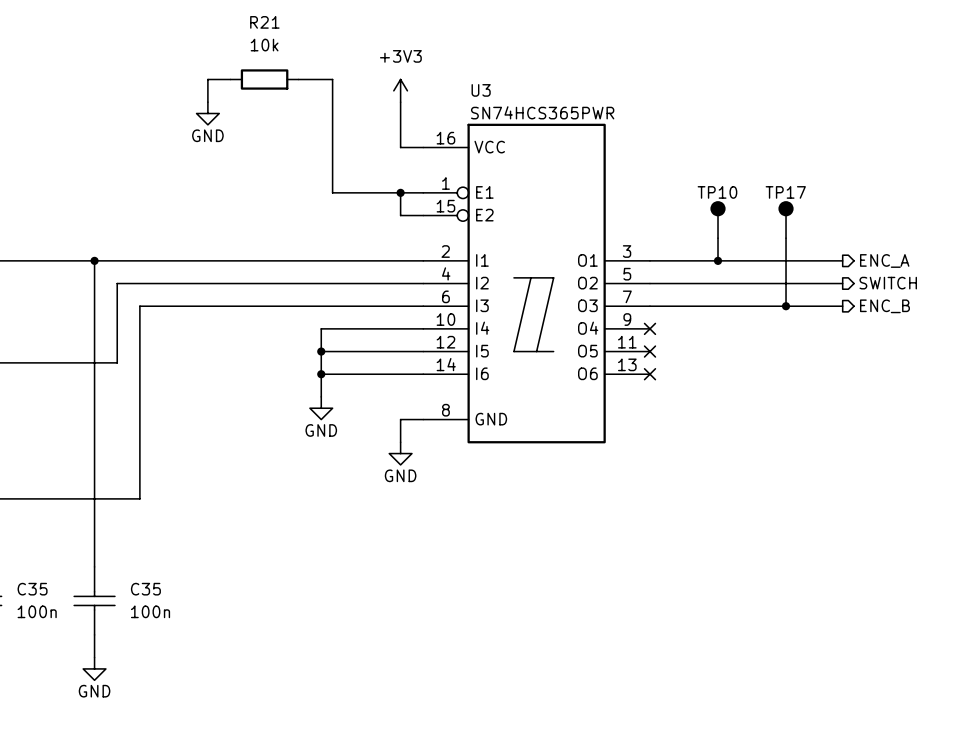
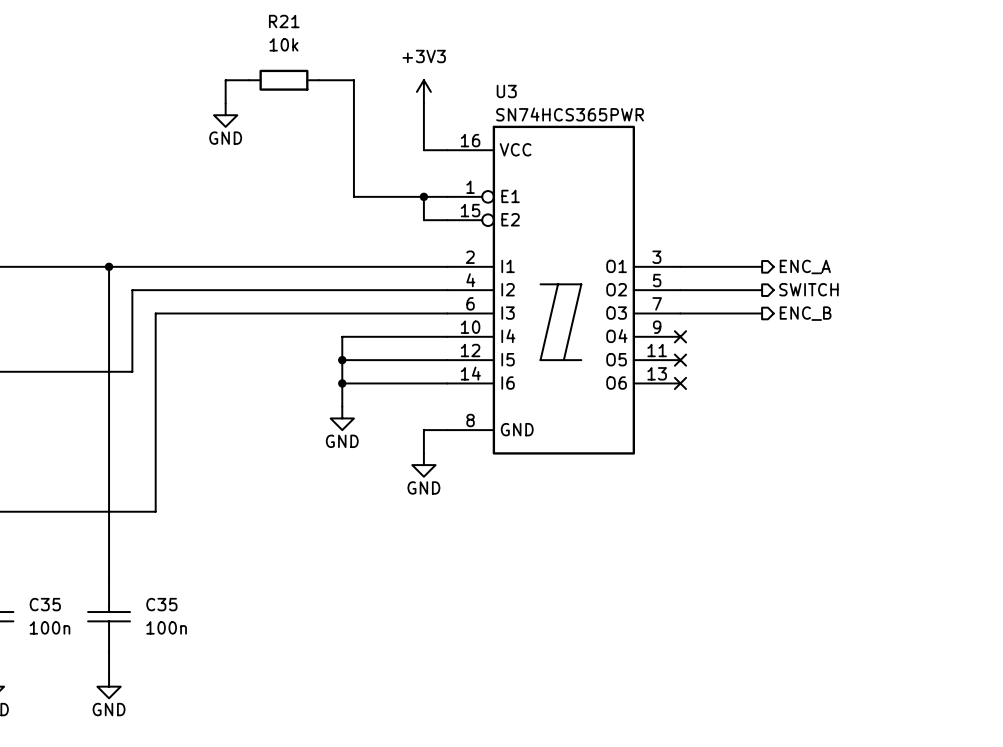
TP10: (718, 220) -> none
TP17: (786, 220) -> none
wire: (718, 238) (718, 260) -> none
wire: (786, 238) (786, 306) -> none
junction: (718, 260) -> none
wire: (729, 260) (842, 260) -> none
hierarchical label position: ENC_A (884, 260) -> ENC_A (805, 266)
wire: (729, 283) (842, 283) -> none
hierarchical label position: SWITCH (888, 283) -> SWITCH (808, 289)
wire: (729, 306) (842, 306) -> none
junction: (786, 306) -> none
hierarchical label position: ENC_B (884, 306) -> ENC_B (805, 313)

